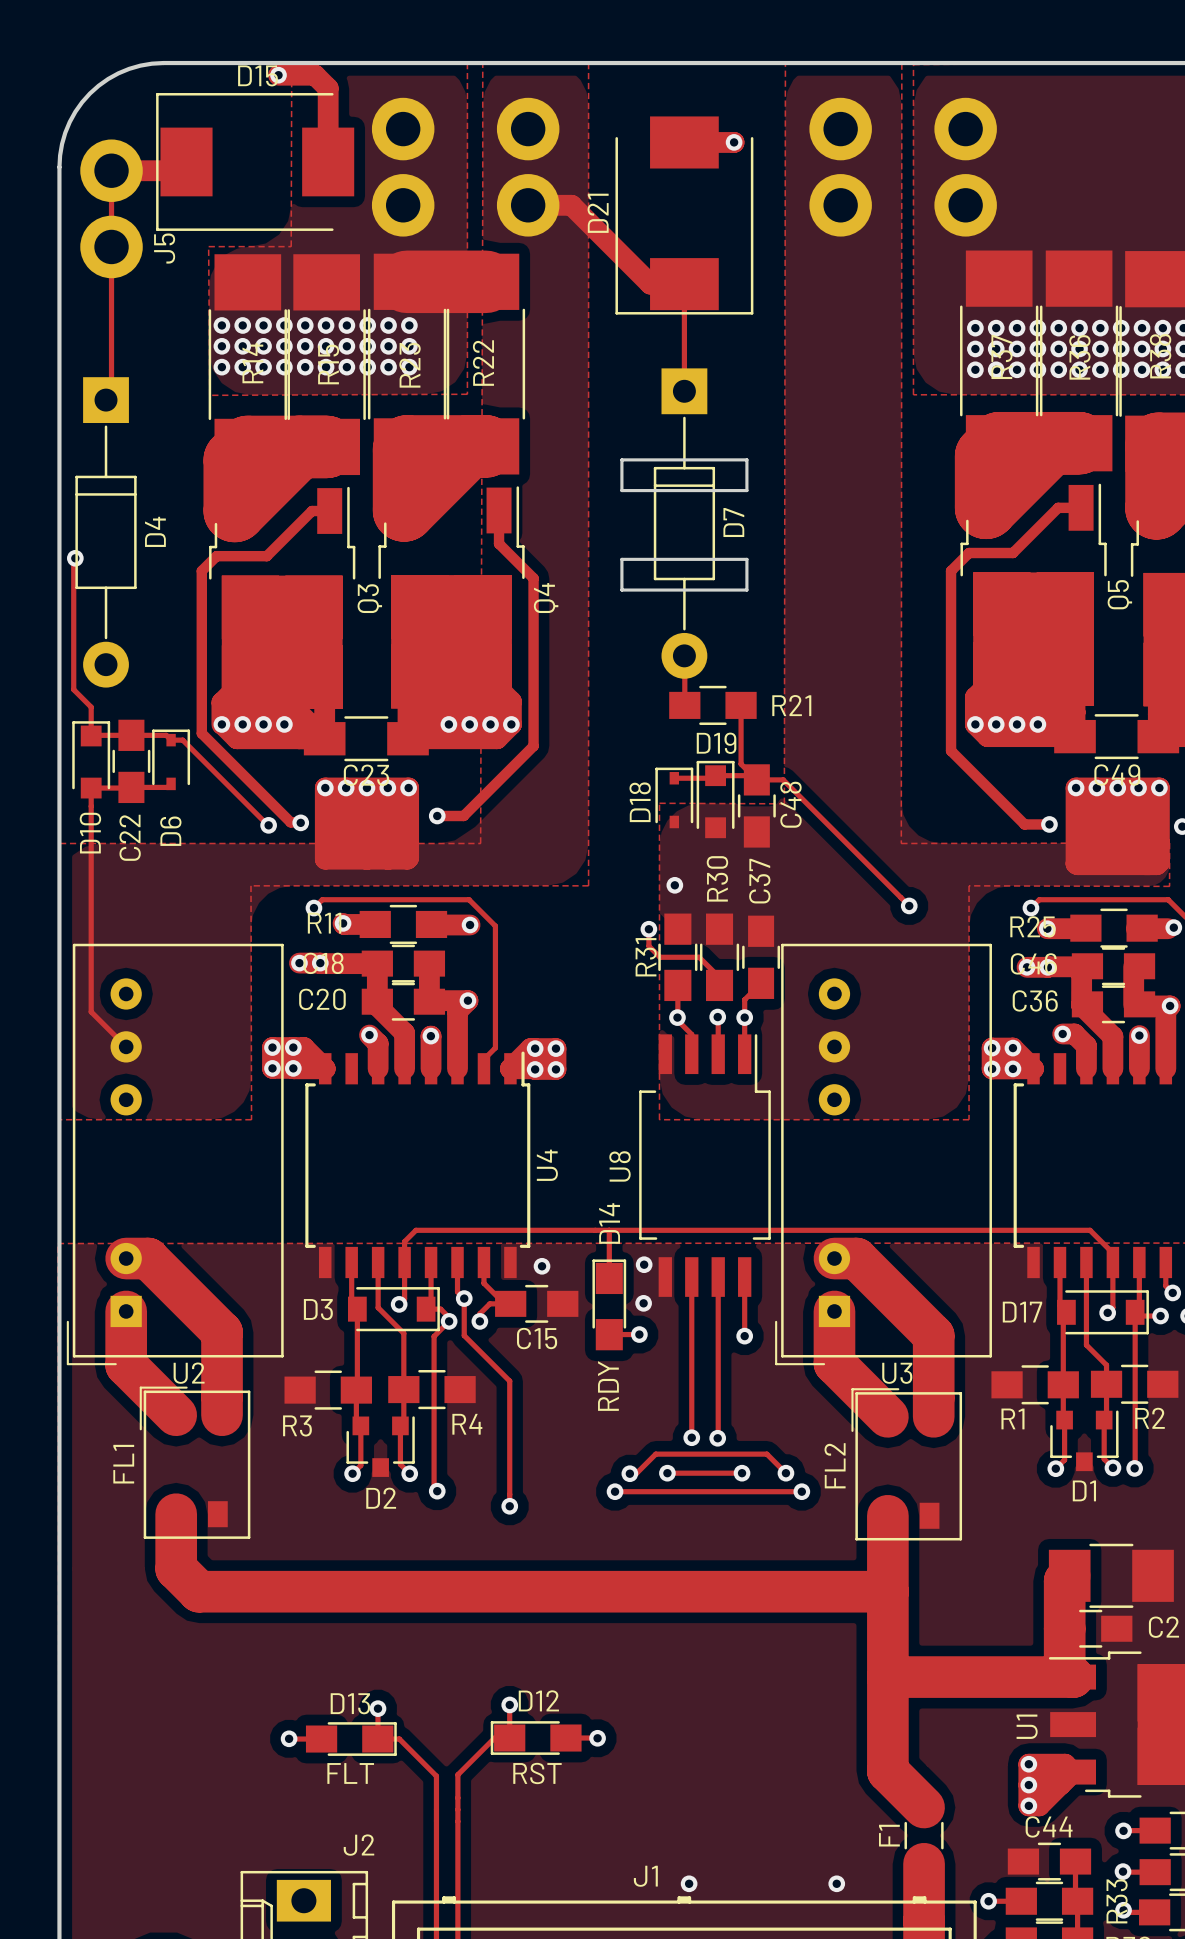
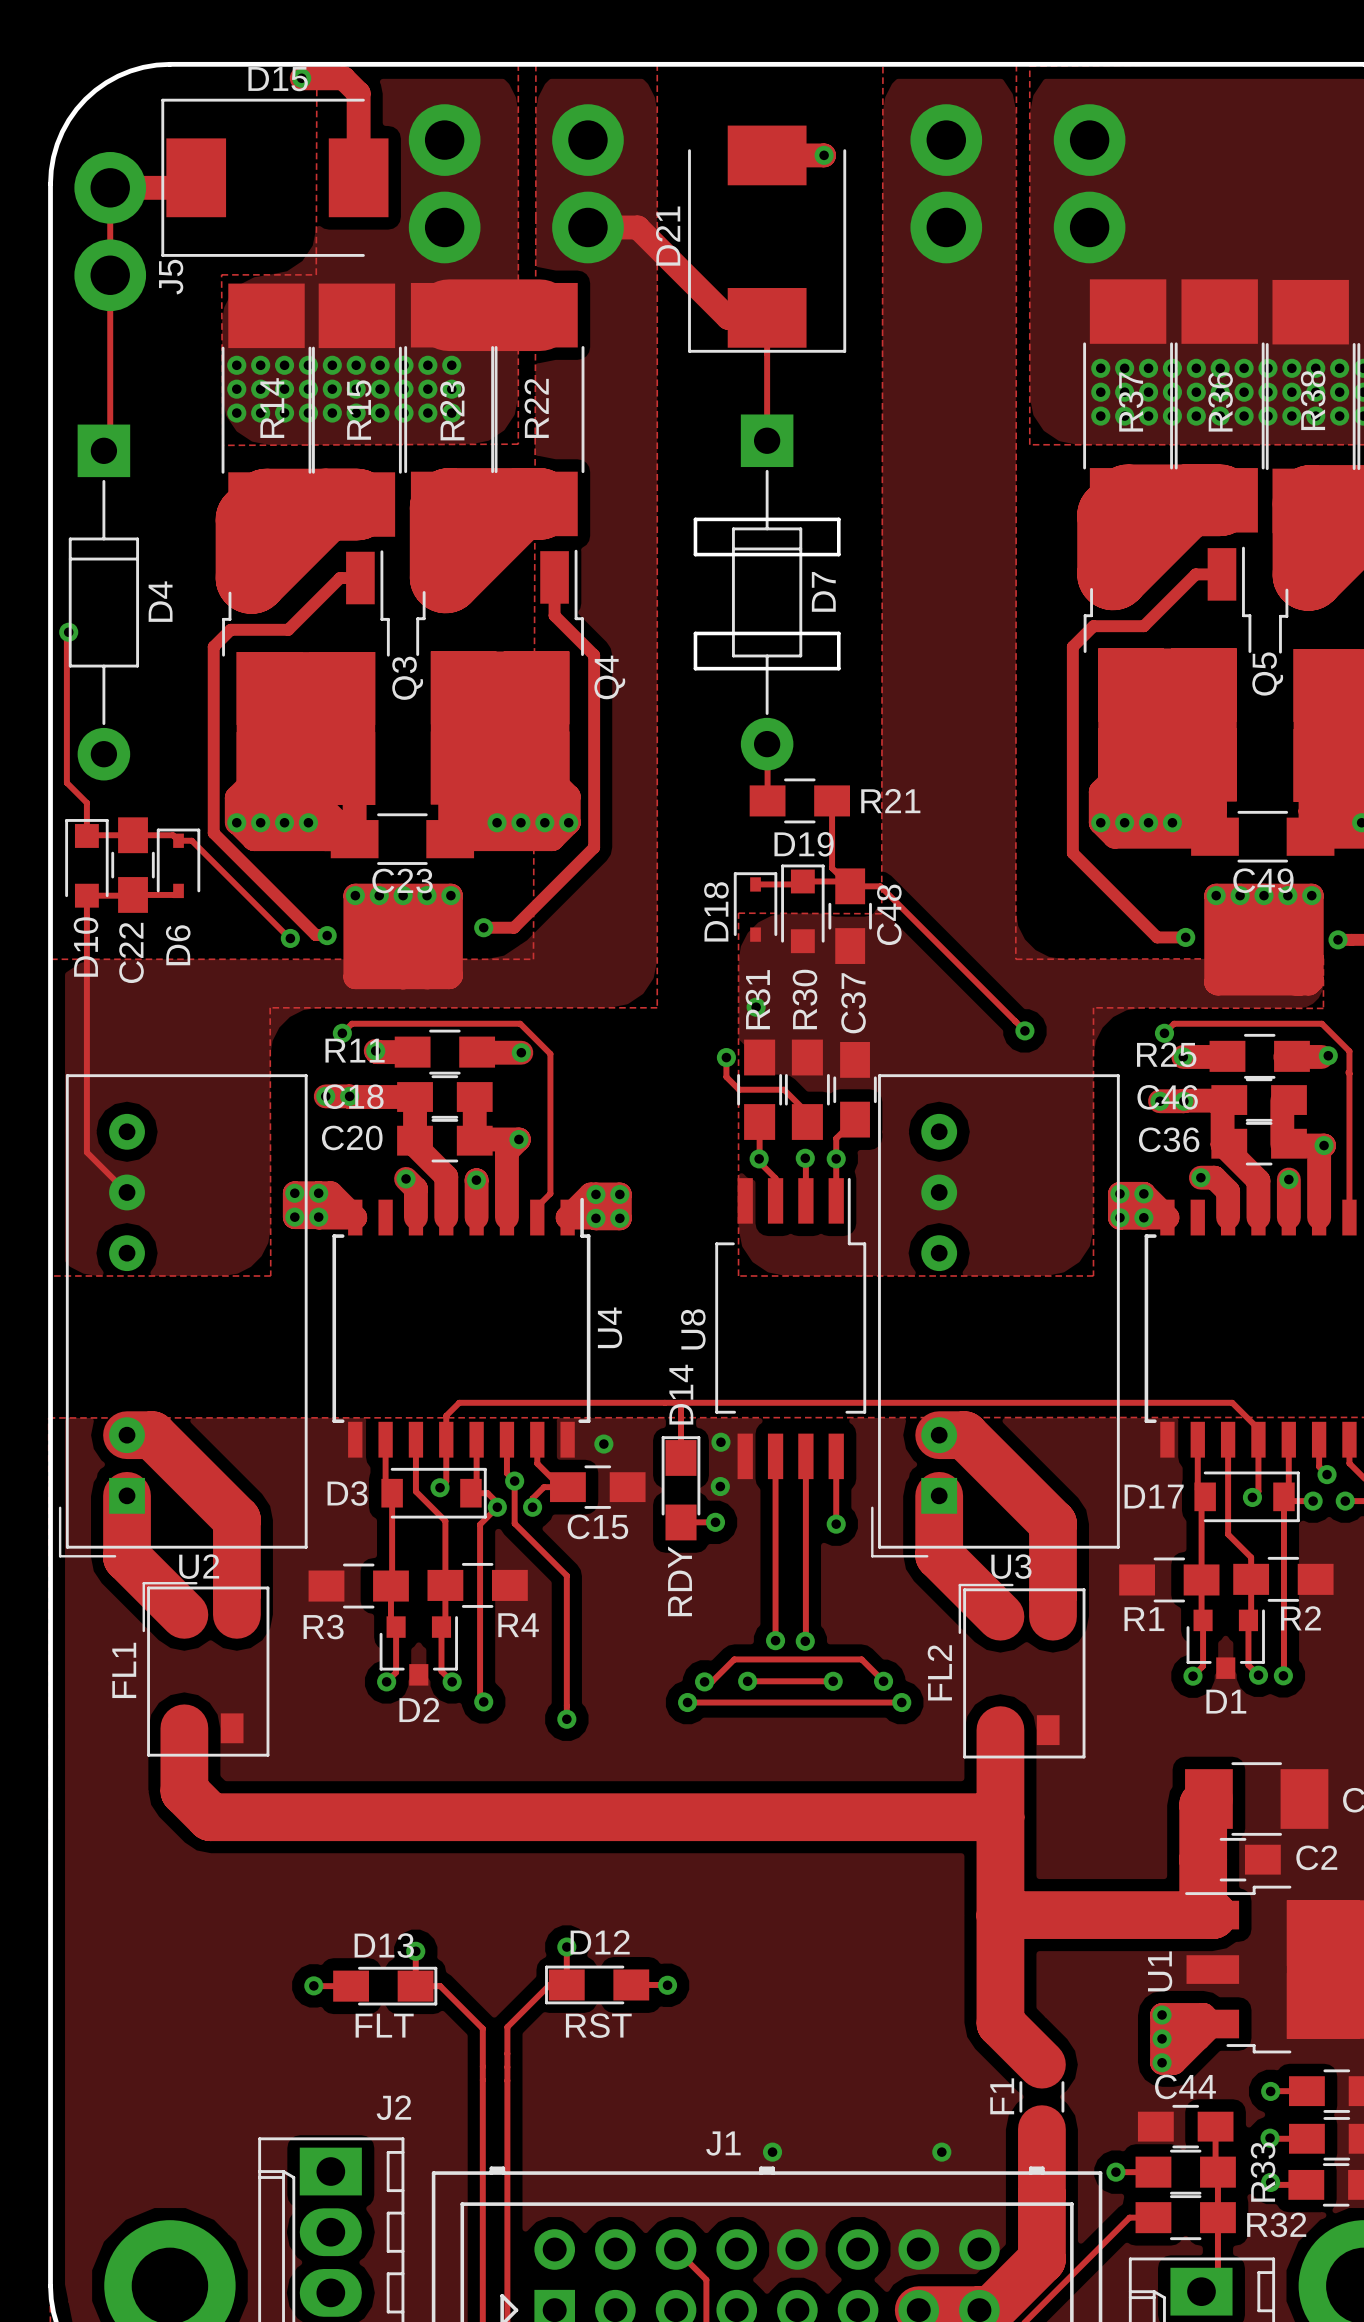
R31 name position: R31 (646, 957) -> R31 (757, 999)

